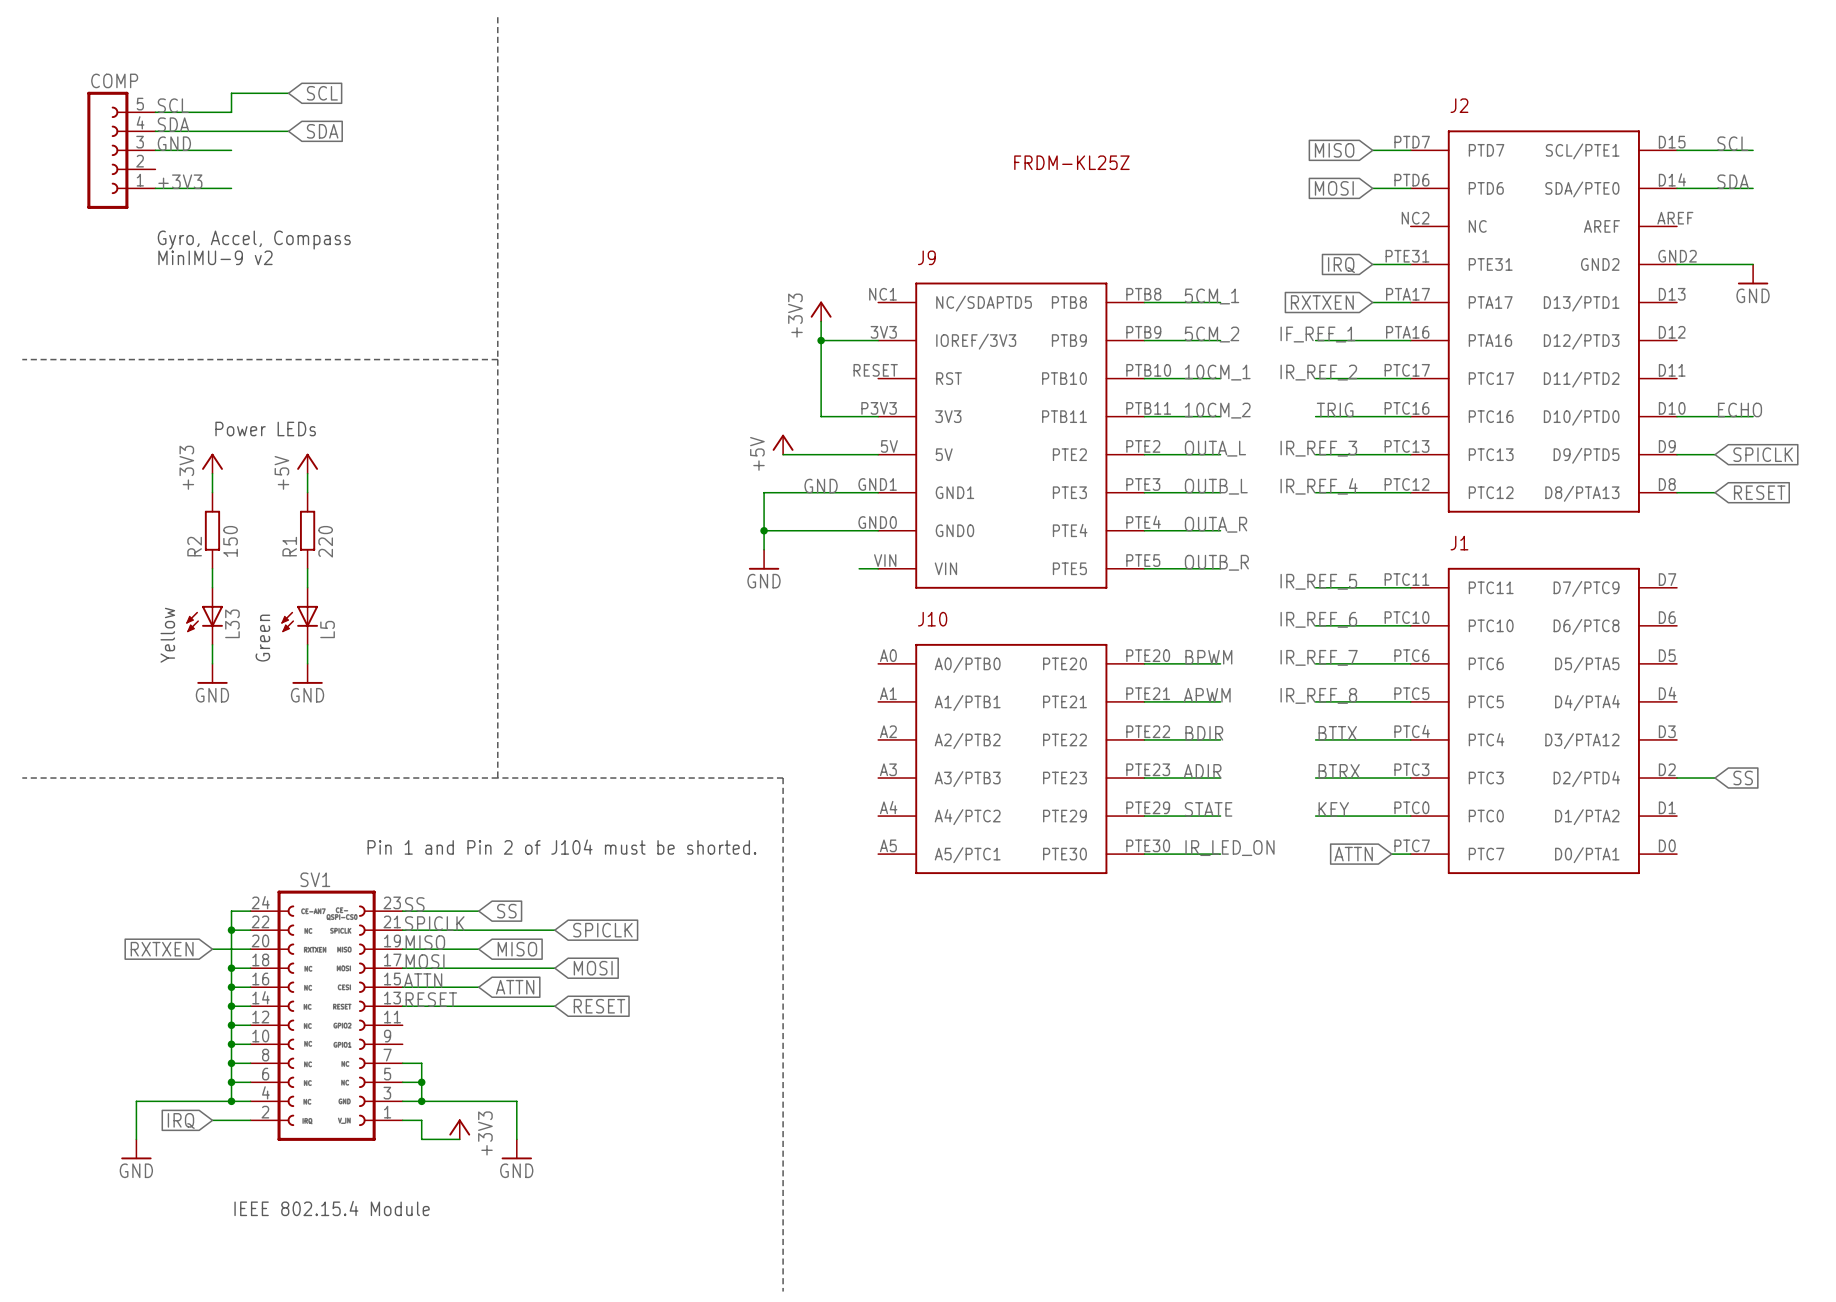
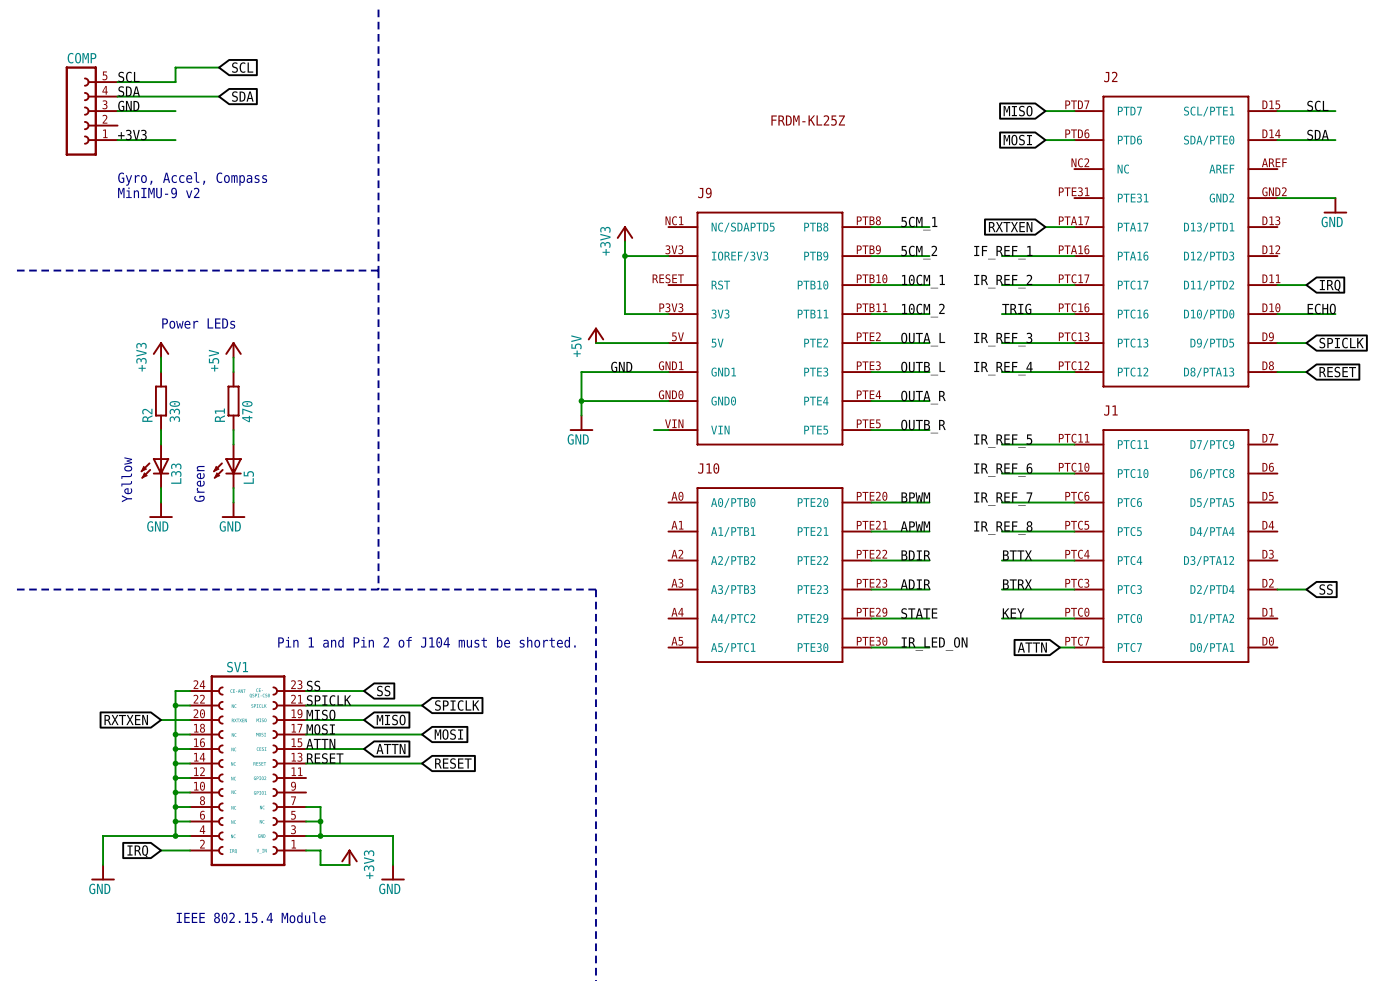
wire: (1372, 264) (1410, 264) -> none
global label: IRQ (1341, 265) -> none
wire: none -> (1277, 285) (1306, 285)
global label: none -> IRQ (1330, 285)
R2 value: 150 (230, 541) -> 330 (174, 411)
R1 value: 220 (325, 541) -> 470 (247, 411)

